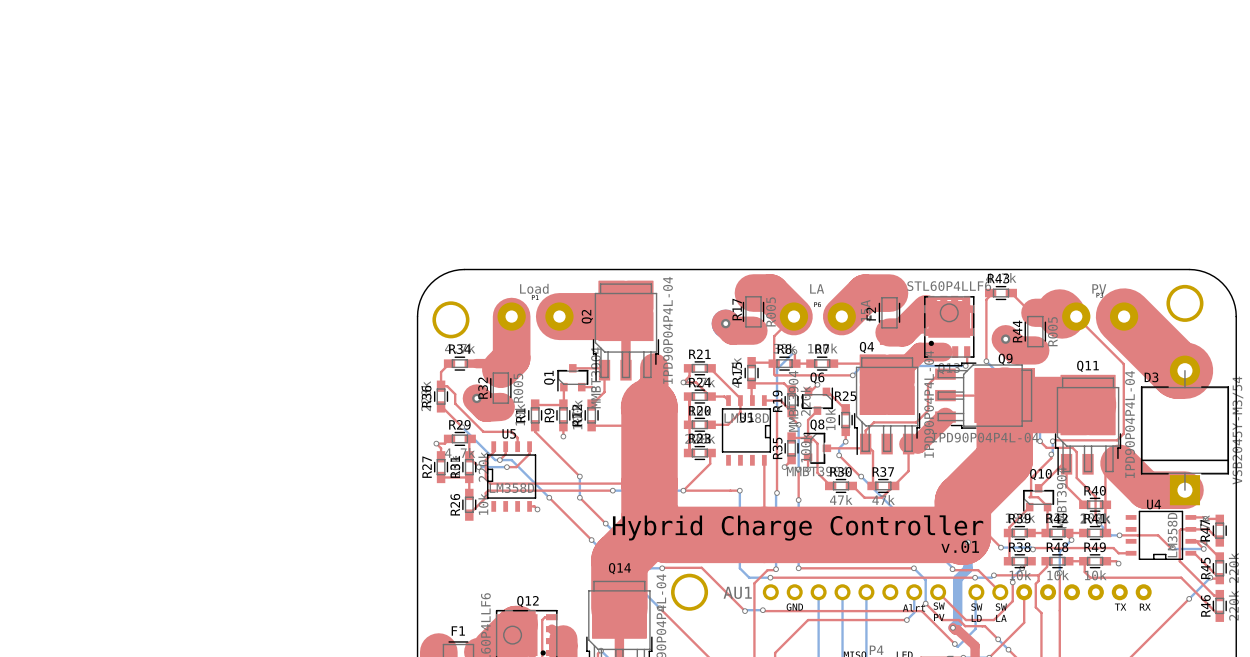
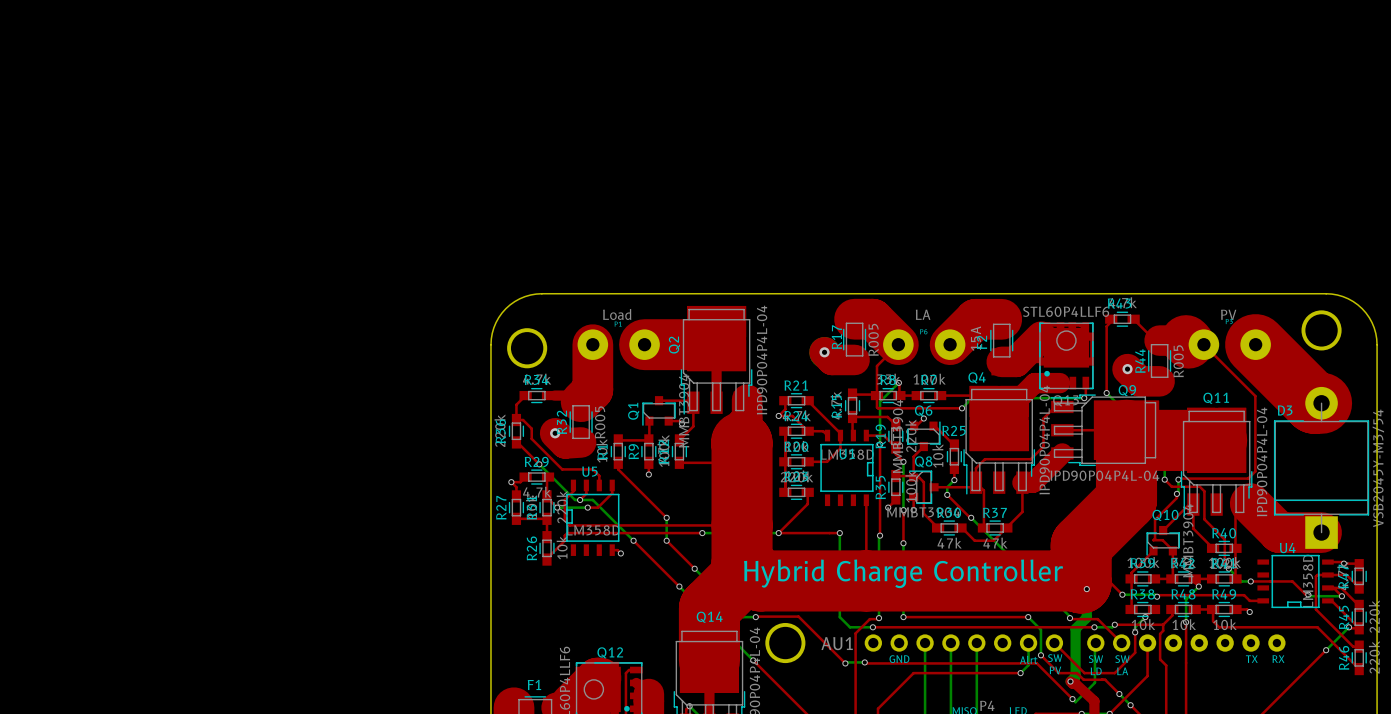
text: v.01 (960, 546) -> none

